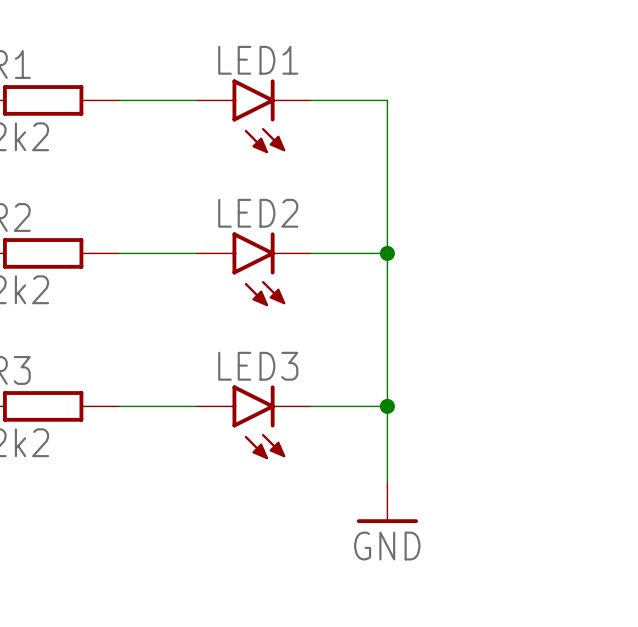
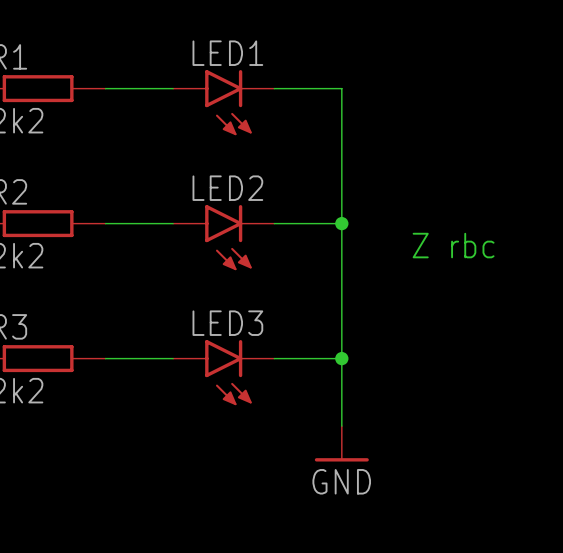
text: none -> Z rbc (453, 245)

